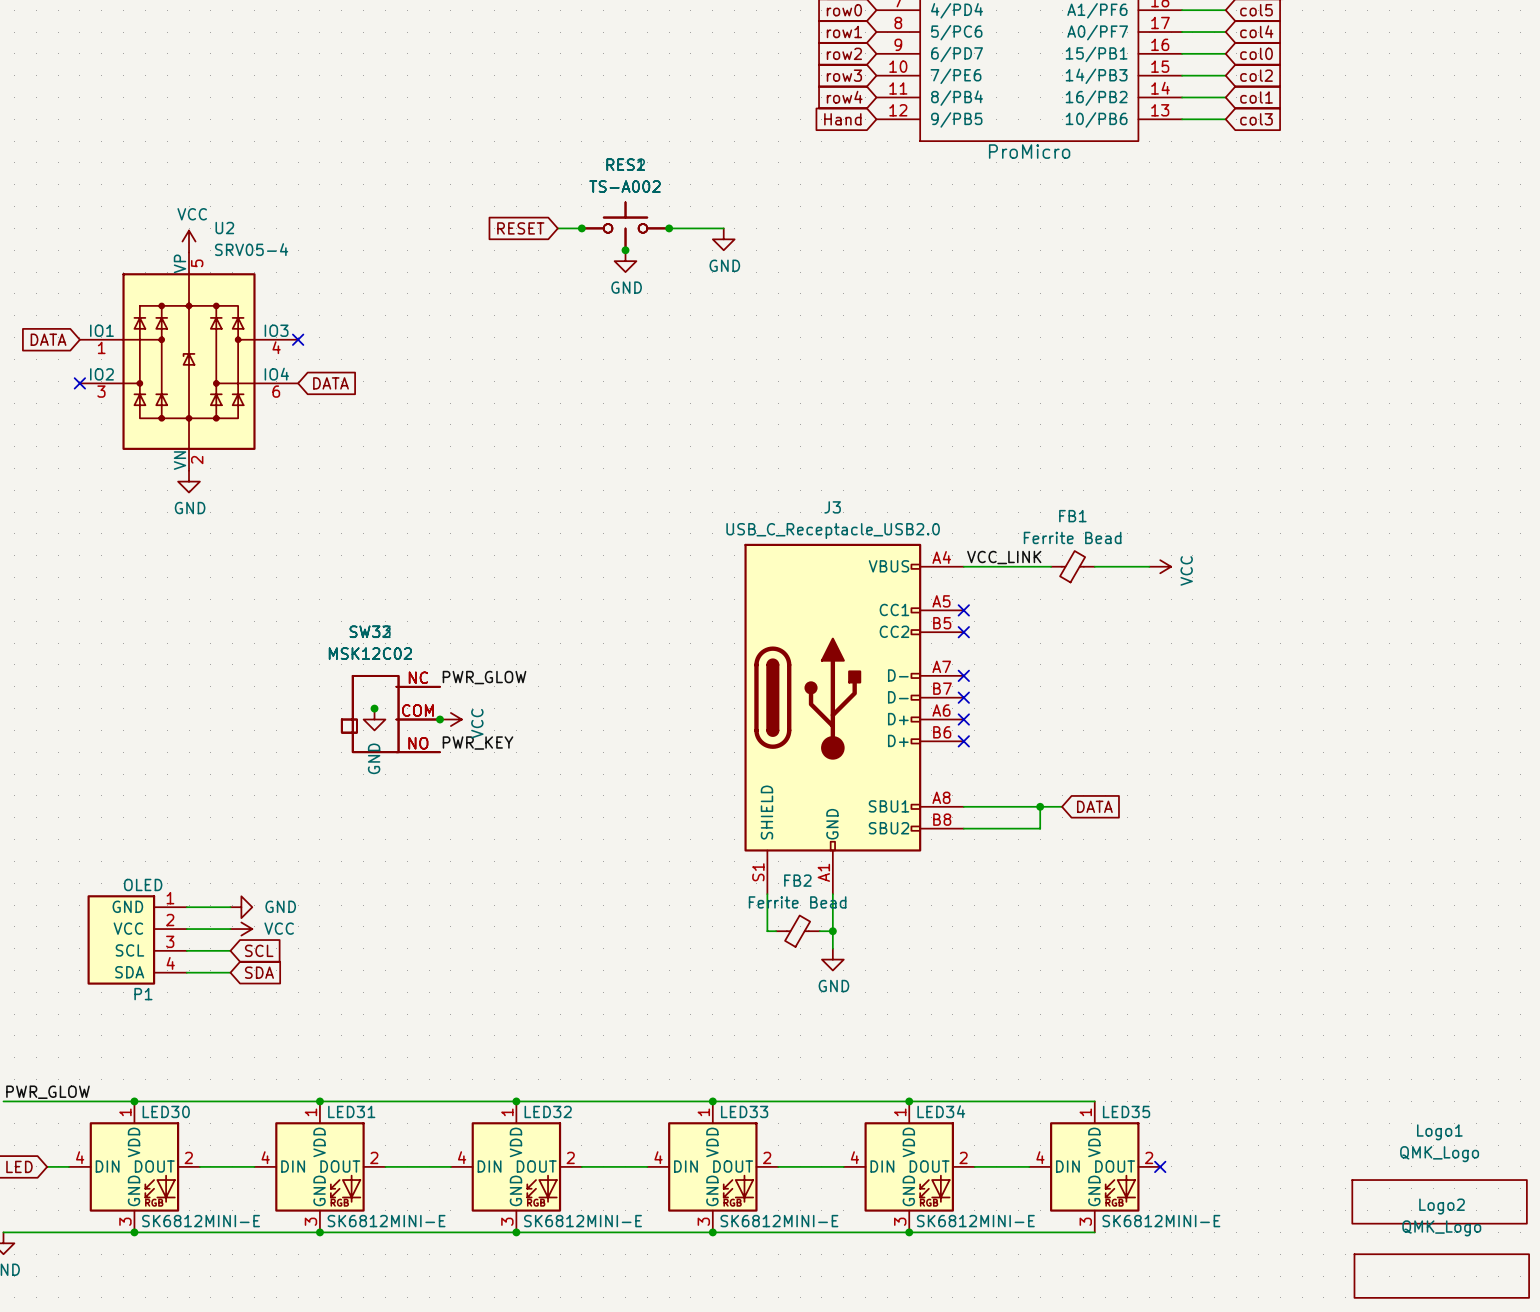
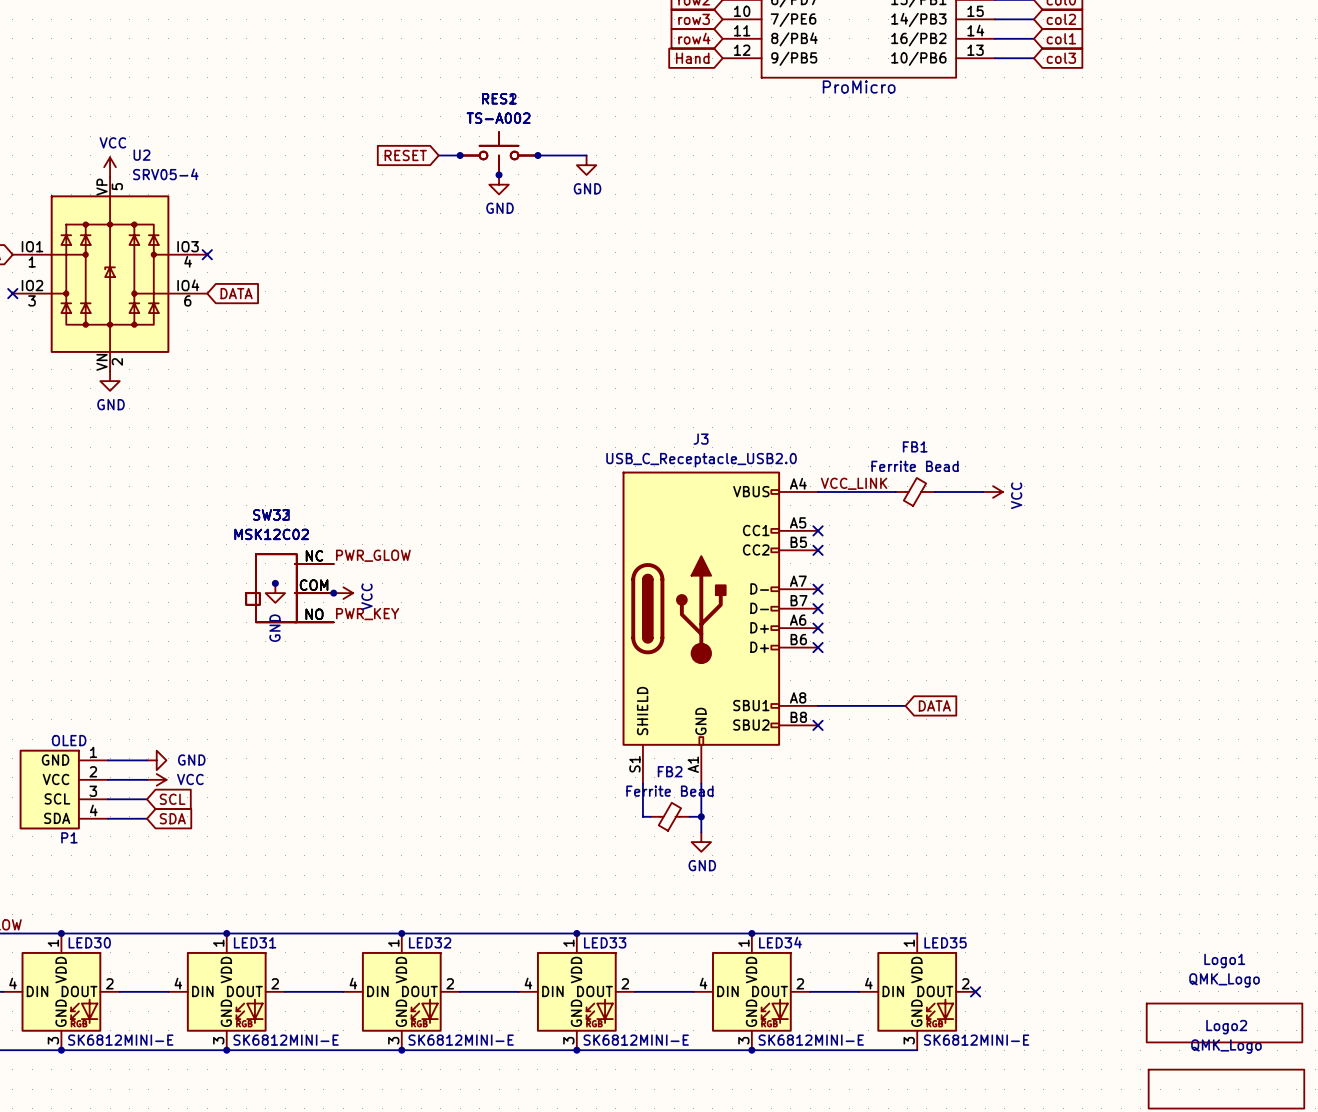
label position: VCC_LINK (1004, 557) -> VCC_LINK (854, 483)
wire: (963, 566) (1051, 566) -> (818, 491) (895, 491)
FB1 position: (1072, 566) -> (915, 491)
wire: (1094, 566) (1149, 566) -> (934, 491) (983, 491)
power symbol position: VCC (1160, 566) -> VCC (993, 491)
no-connect mark: (963, 610) -> none
no-connect mark: (963, 632) -> none
no-connect mark: none -> (818, 530)
no-connect mark: none -> (818, 550)
no-connect mark: (963, 675) -> none
no-connect mark: (963, 697) -> none
no-connect mark: none -> (818, 589)
J3 position: (854, 718) -> (720, 627)
no-connect mark: (963, 719) -> none
no-connect mark: none -> (818, 608)
no-connect mark: (963, 741) -> none
no-connect mark: none -> (818, 628)
no-connect mark: none -> (818, 647)
wire: (963, 806) (1062, 806) -> (818, 705) (905, 705)
wire: (1040, 806) (1040, 828) (963, 828) -> none
junction: (1040, 806) -> none
global label position: DATA (1094, 806) -> DATA (934, 705)
no-connect mark: none -> (818, 725)
wire: (767, 894) (767, 931) (776, 931) -> (642, 783) (642, 816) (650, 816)
wire: (832, 894) (832, 948) -> (701, 783) (701, 832)
FB2 position: (797, 931) -> (670, 816)
wire: (819, 931) (832, 931) -> (689, 816) (701, 816)
junction position: (832, 931) -> (701, 816)
power symbol position: GND (832, 959) -> GND (701, 842)

